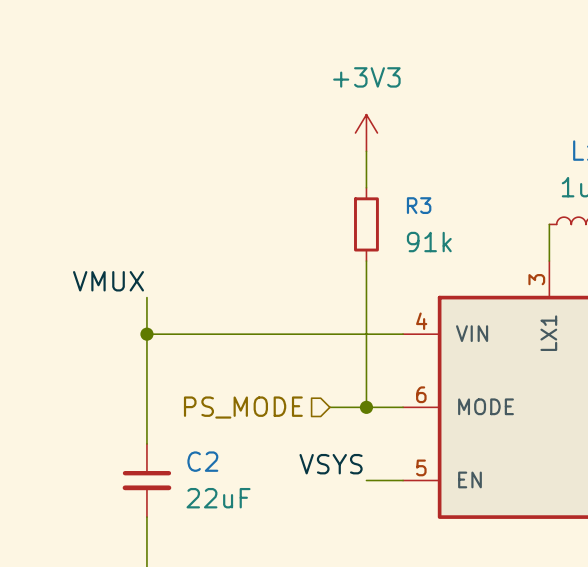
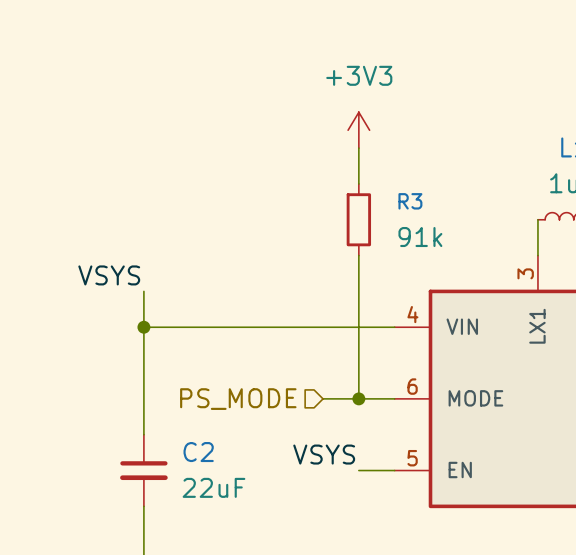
label: VMUX (108, 281) -> VSYS (109, 275)

